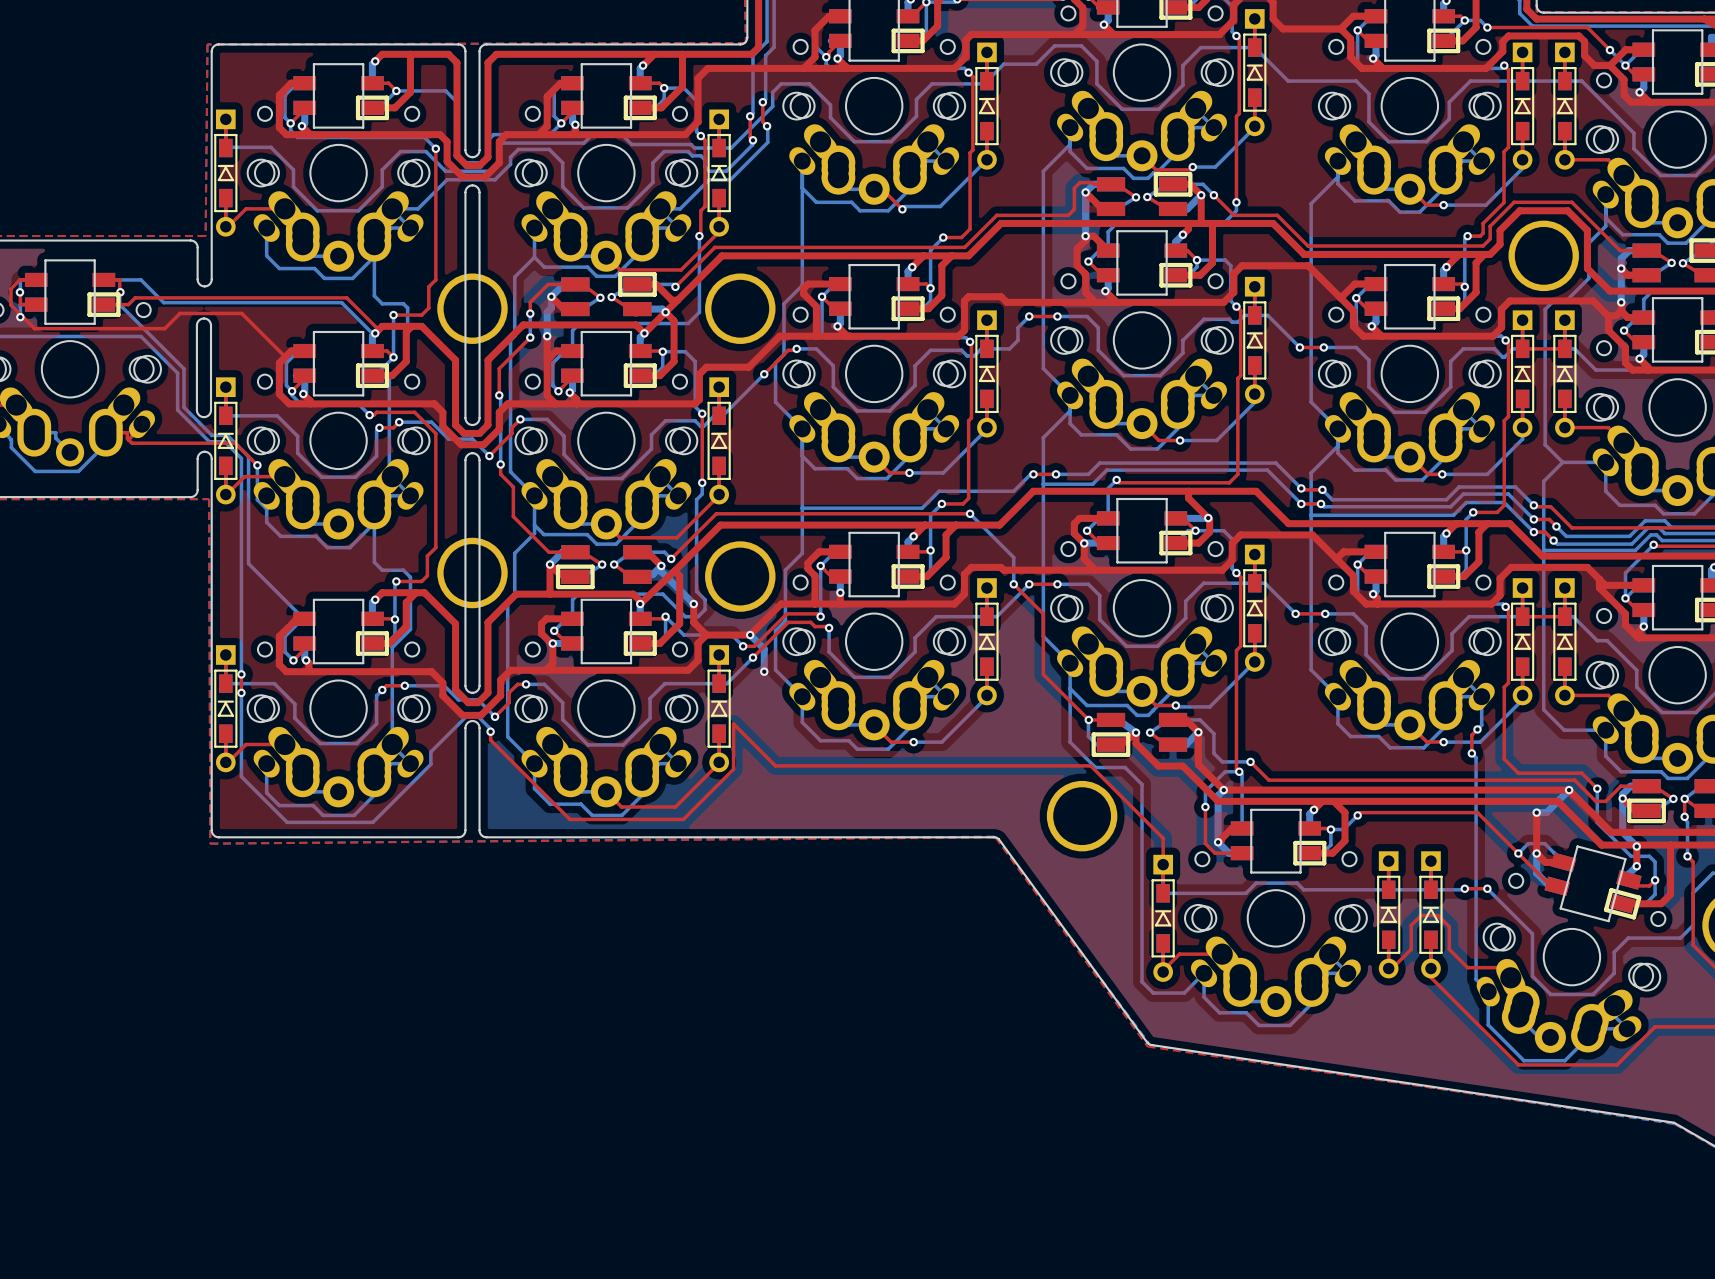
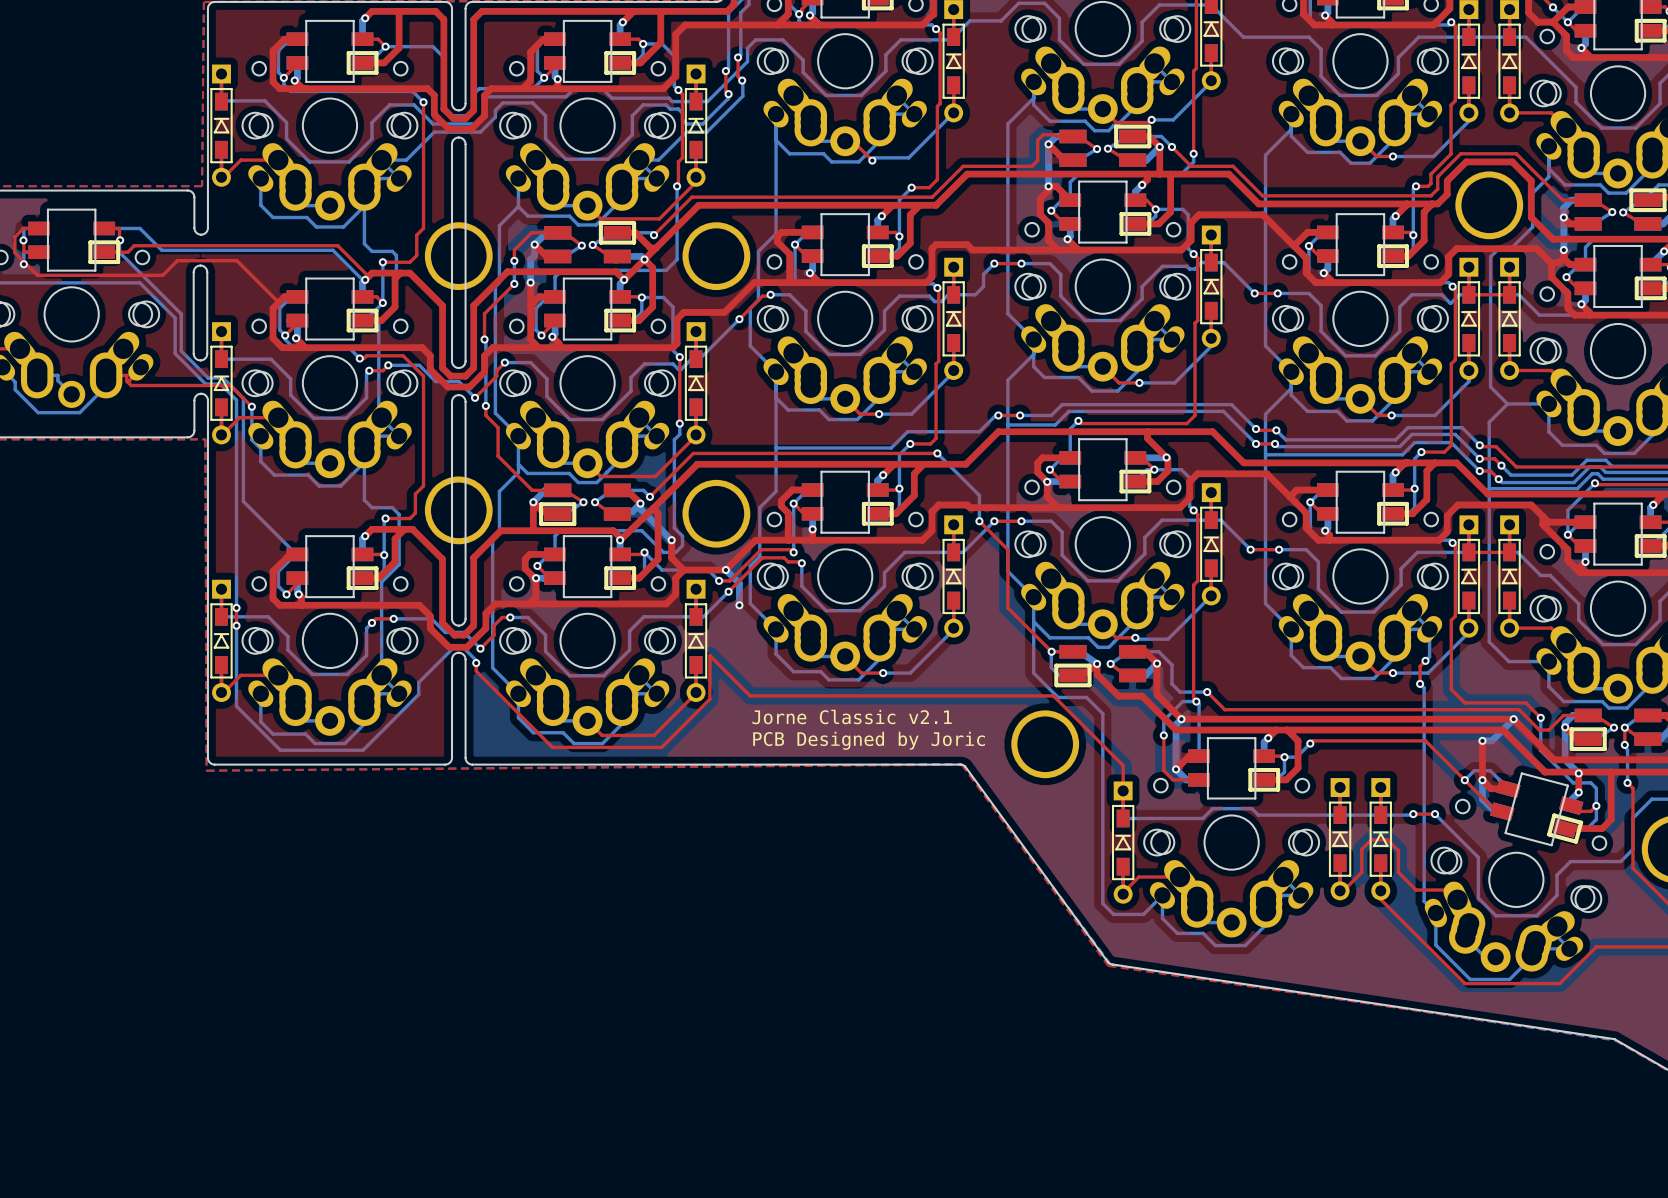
text: none -> Jorne Classic v2.1 (852, 717)
text: none -> PCB Designed by Joric (869, 740)

